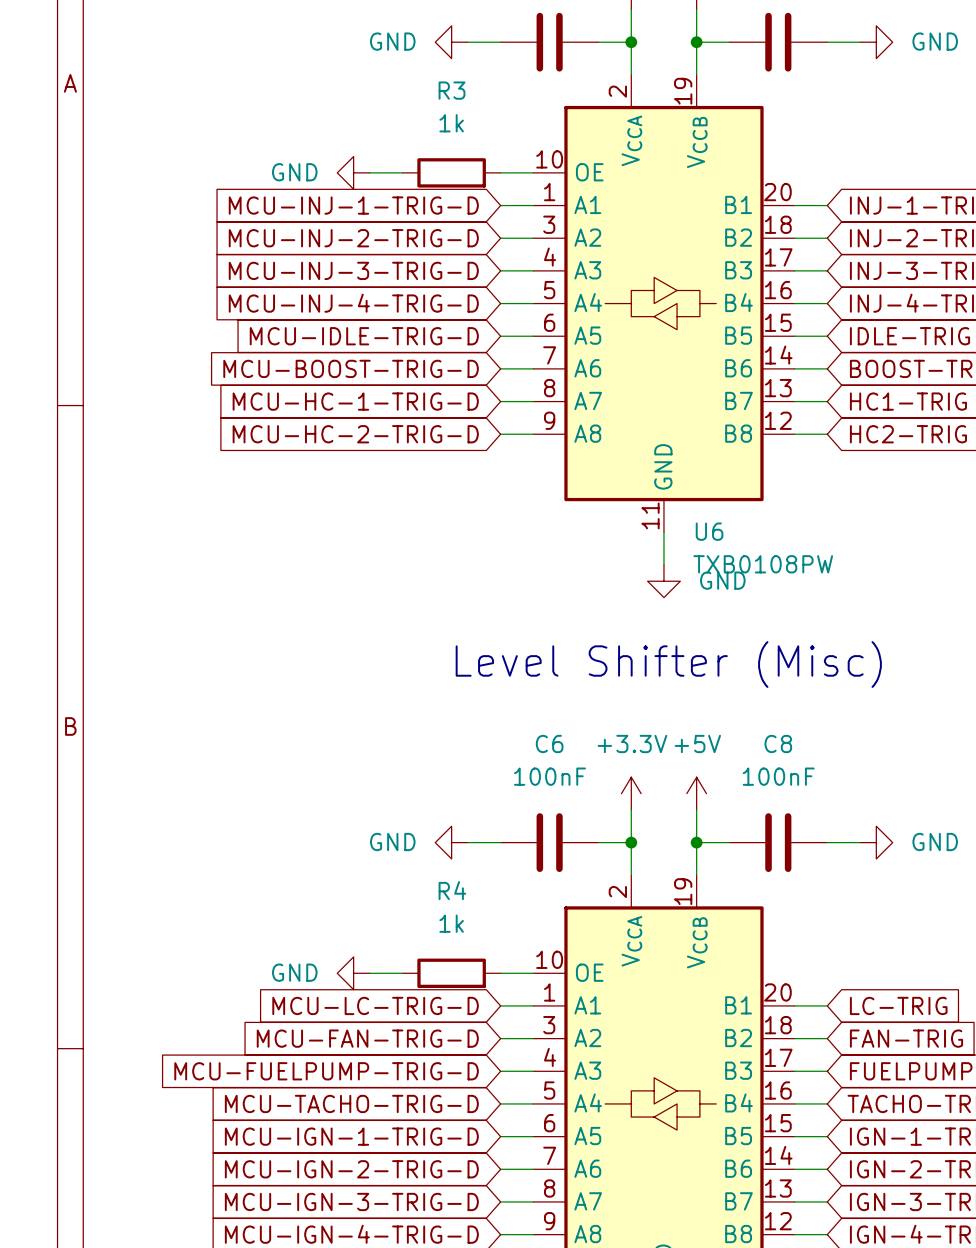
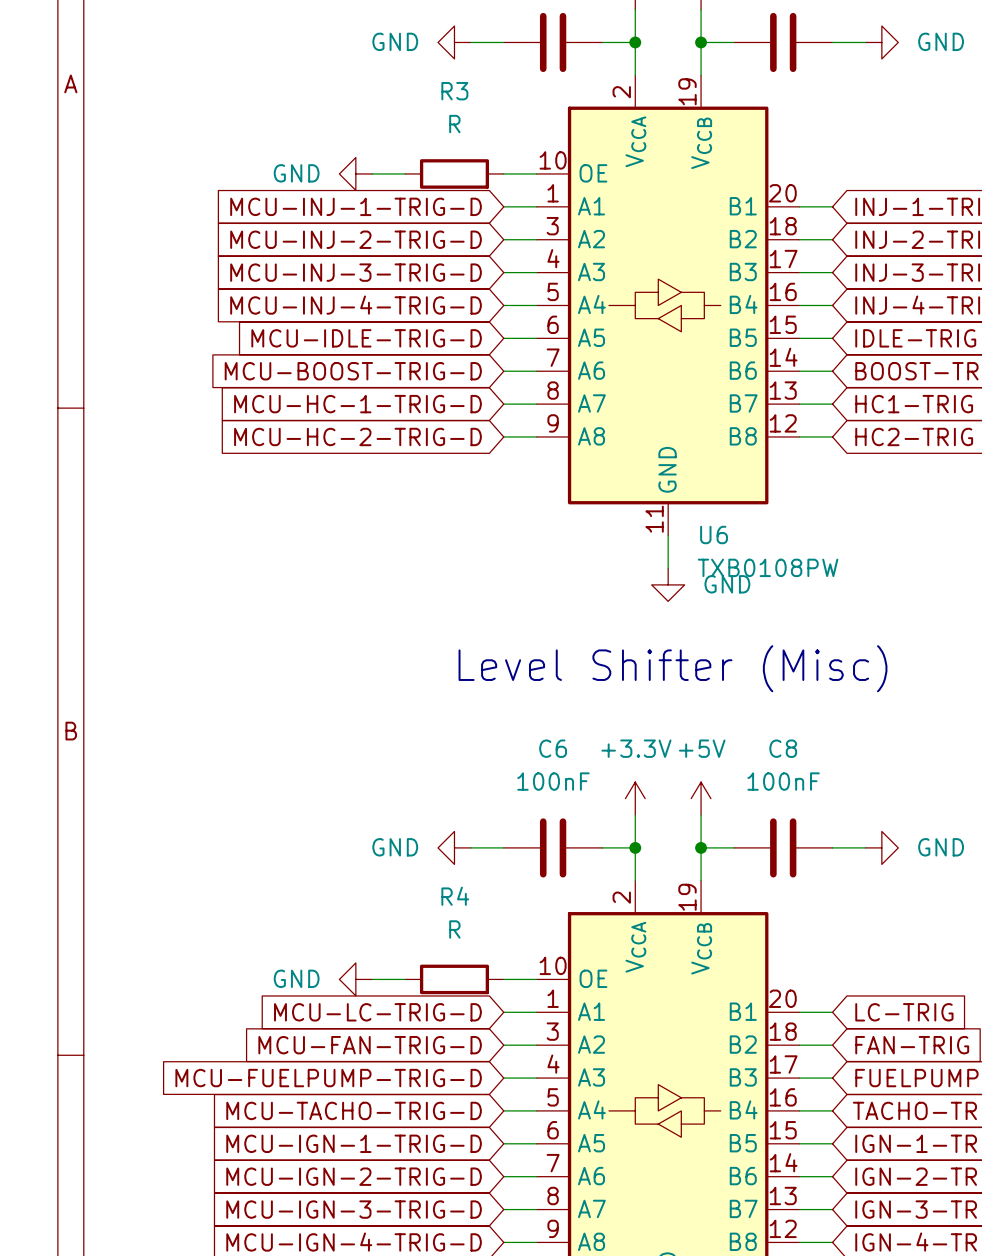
R3 value: 1k (451, 123) -> R (454, 124)
R4 value: 1k (451, 923) -> R (454, 929)

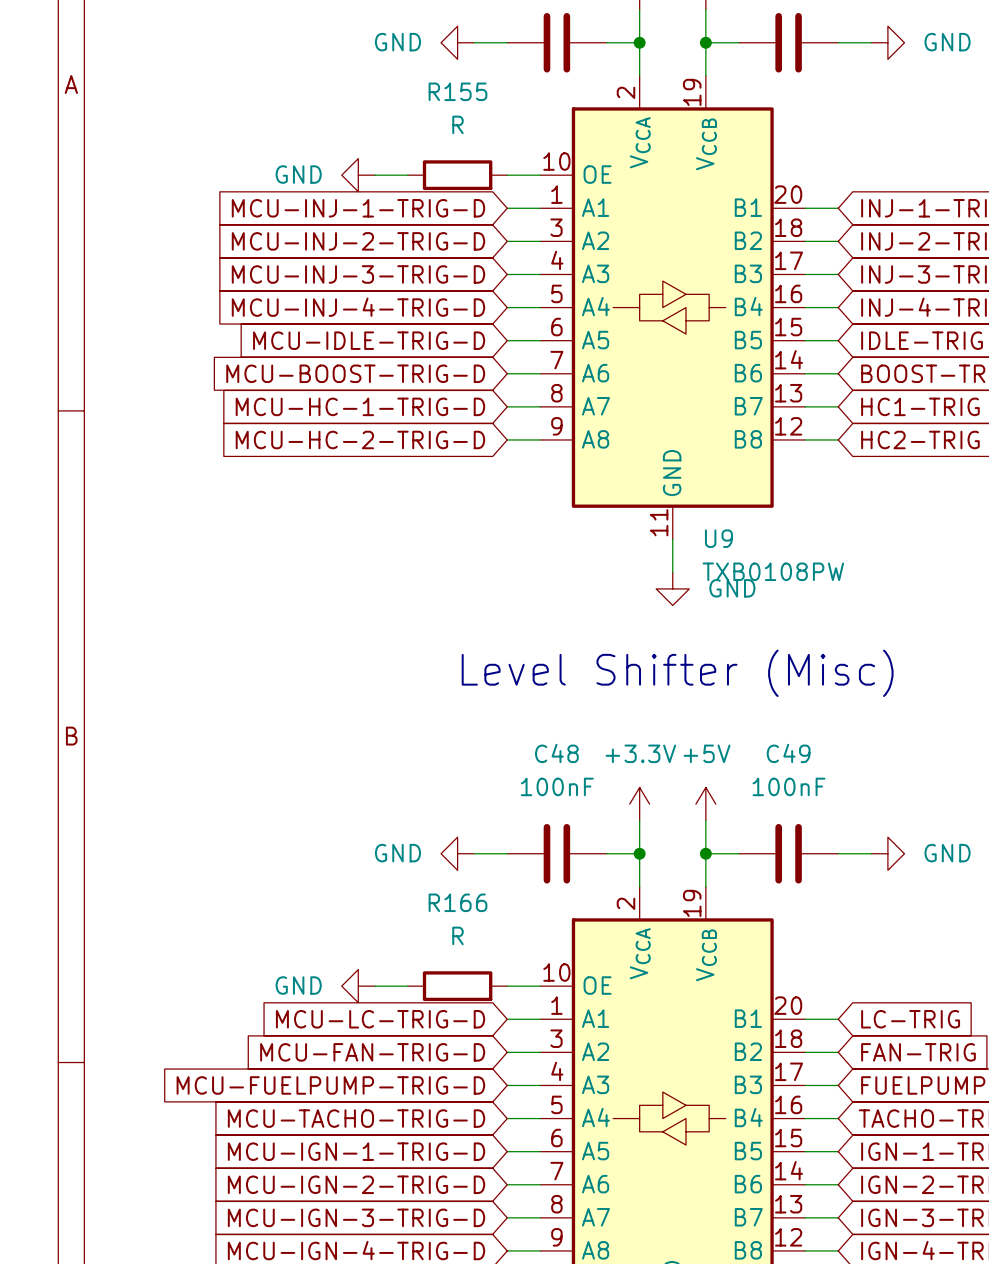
R3 name: R3 (454, 91) -> R155 (457, 91)
U6 name: U6 (714, 534) -> U9 (718, 538)
C6 name: C6 (553, 748) -> C48 (556, 753)
C8 name: C8 (783, 748) -> C49 (788, 753)
R4 name: R4 (455, 896) -> R166 (457, 902)

